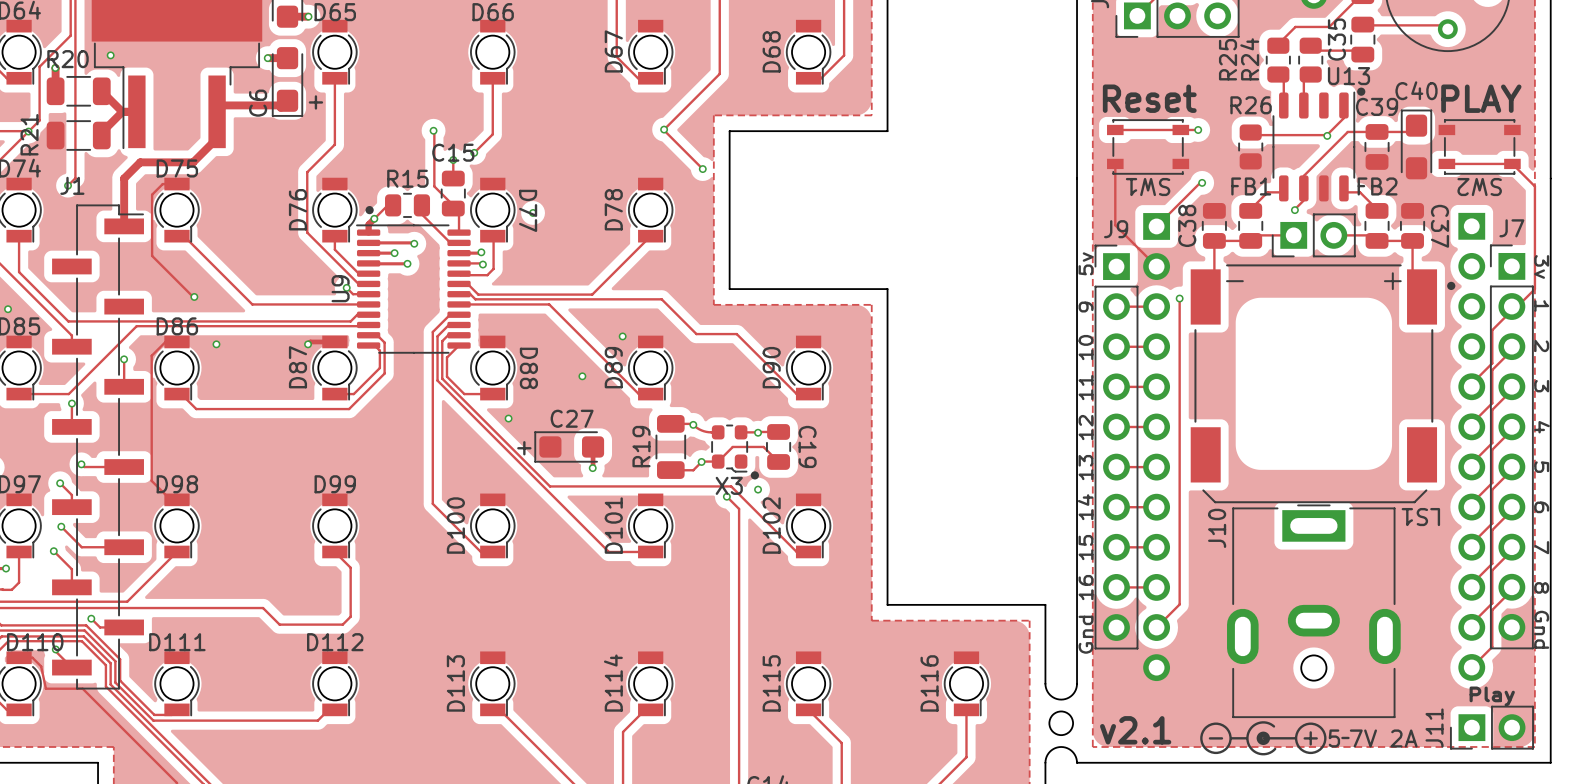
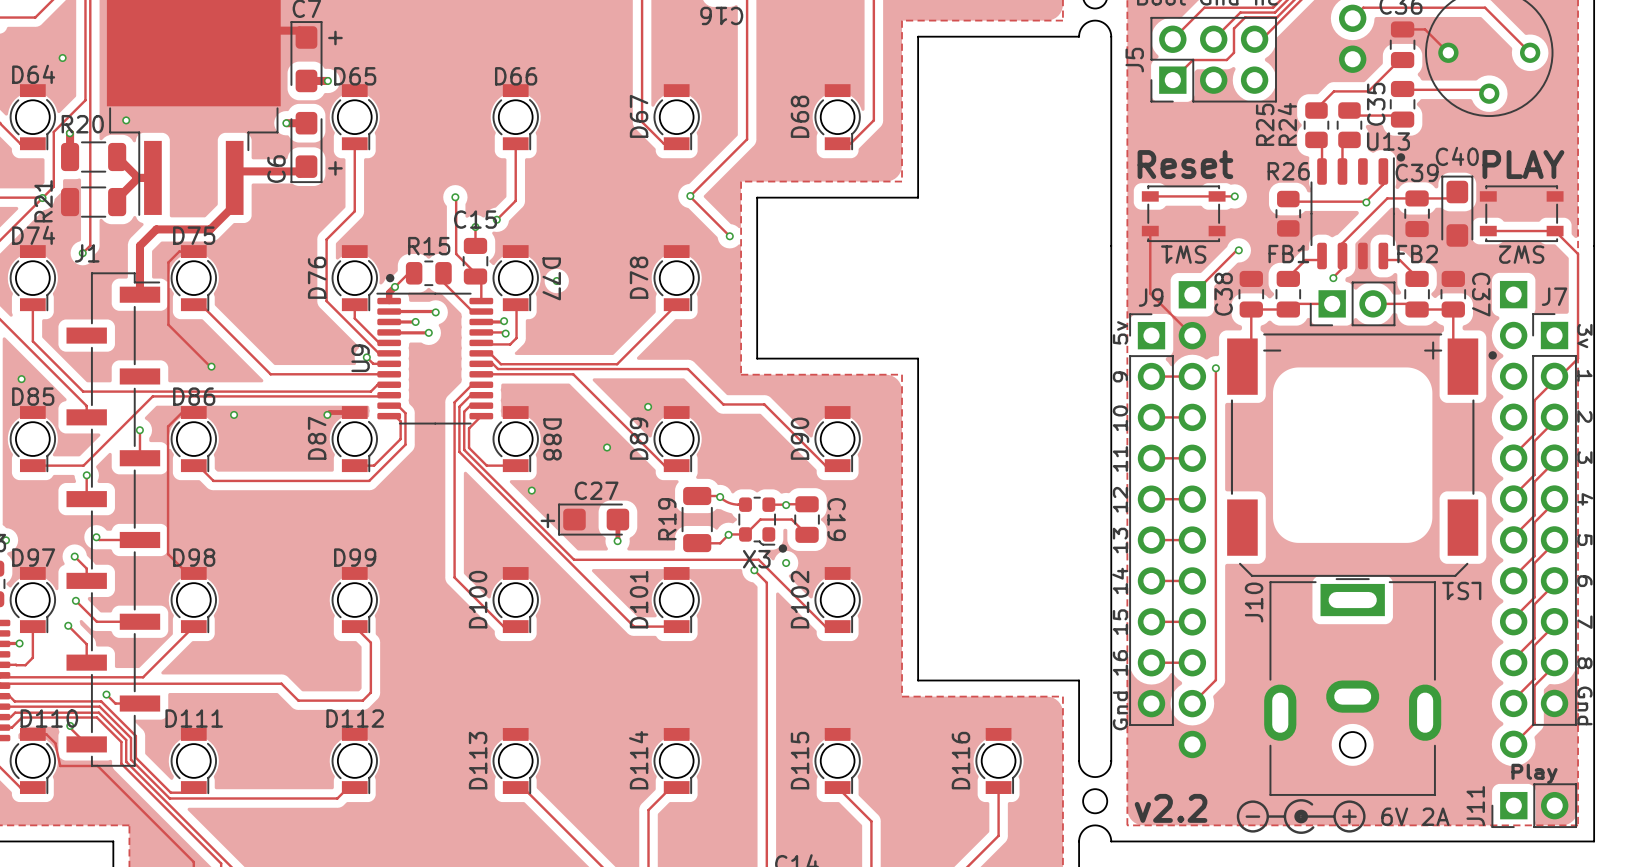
text: v2.1 (1135, 730) -> v2.2 (1171, 808)
text: – (1345, 737) -> none
text: 5 (1334, 738) -> none
text: 7V 2A (1383, 738) -> 6V 2A (1415, 816)

